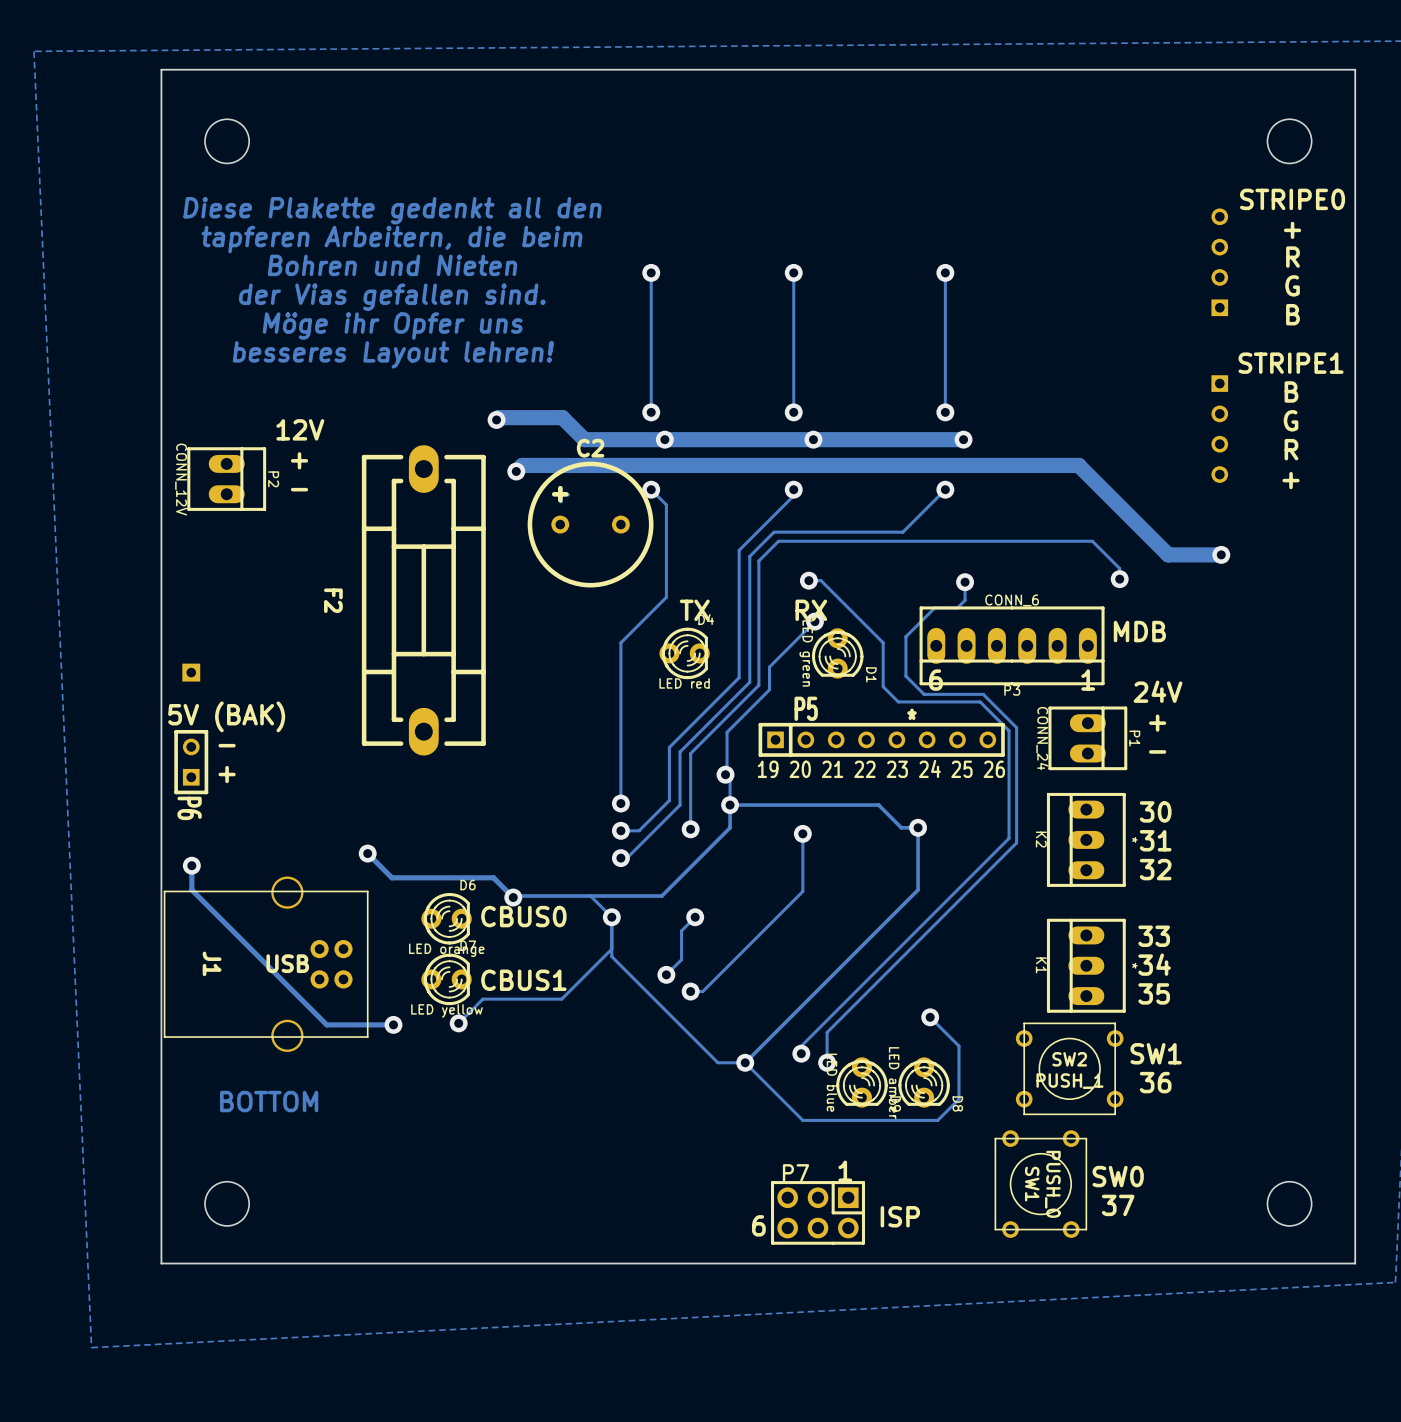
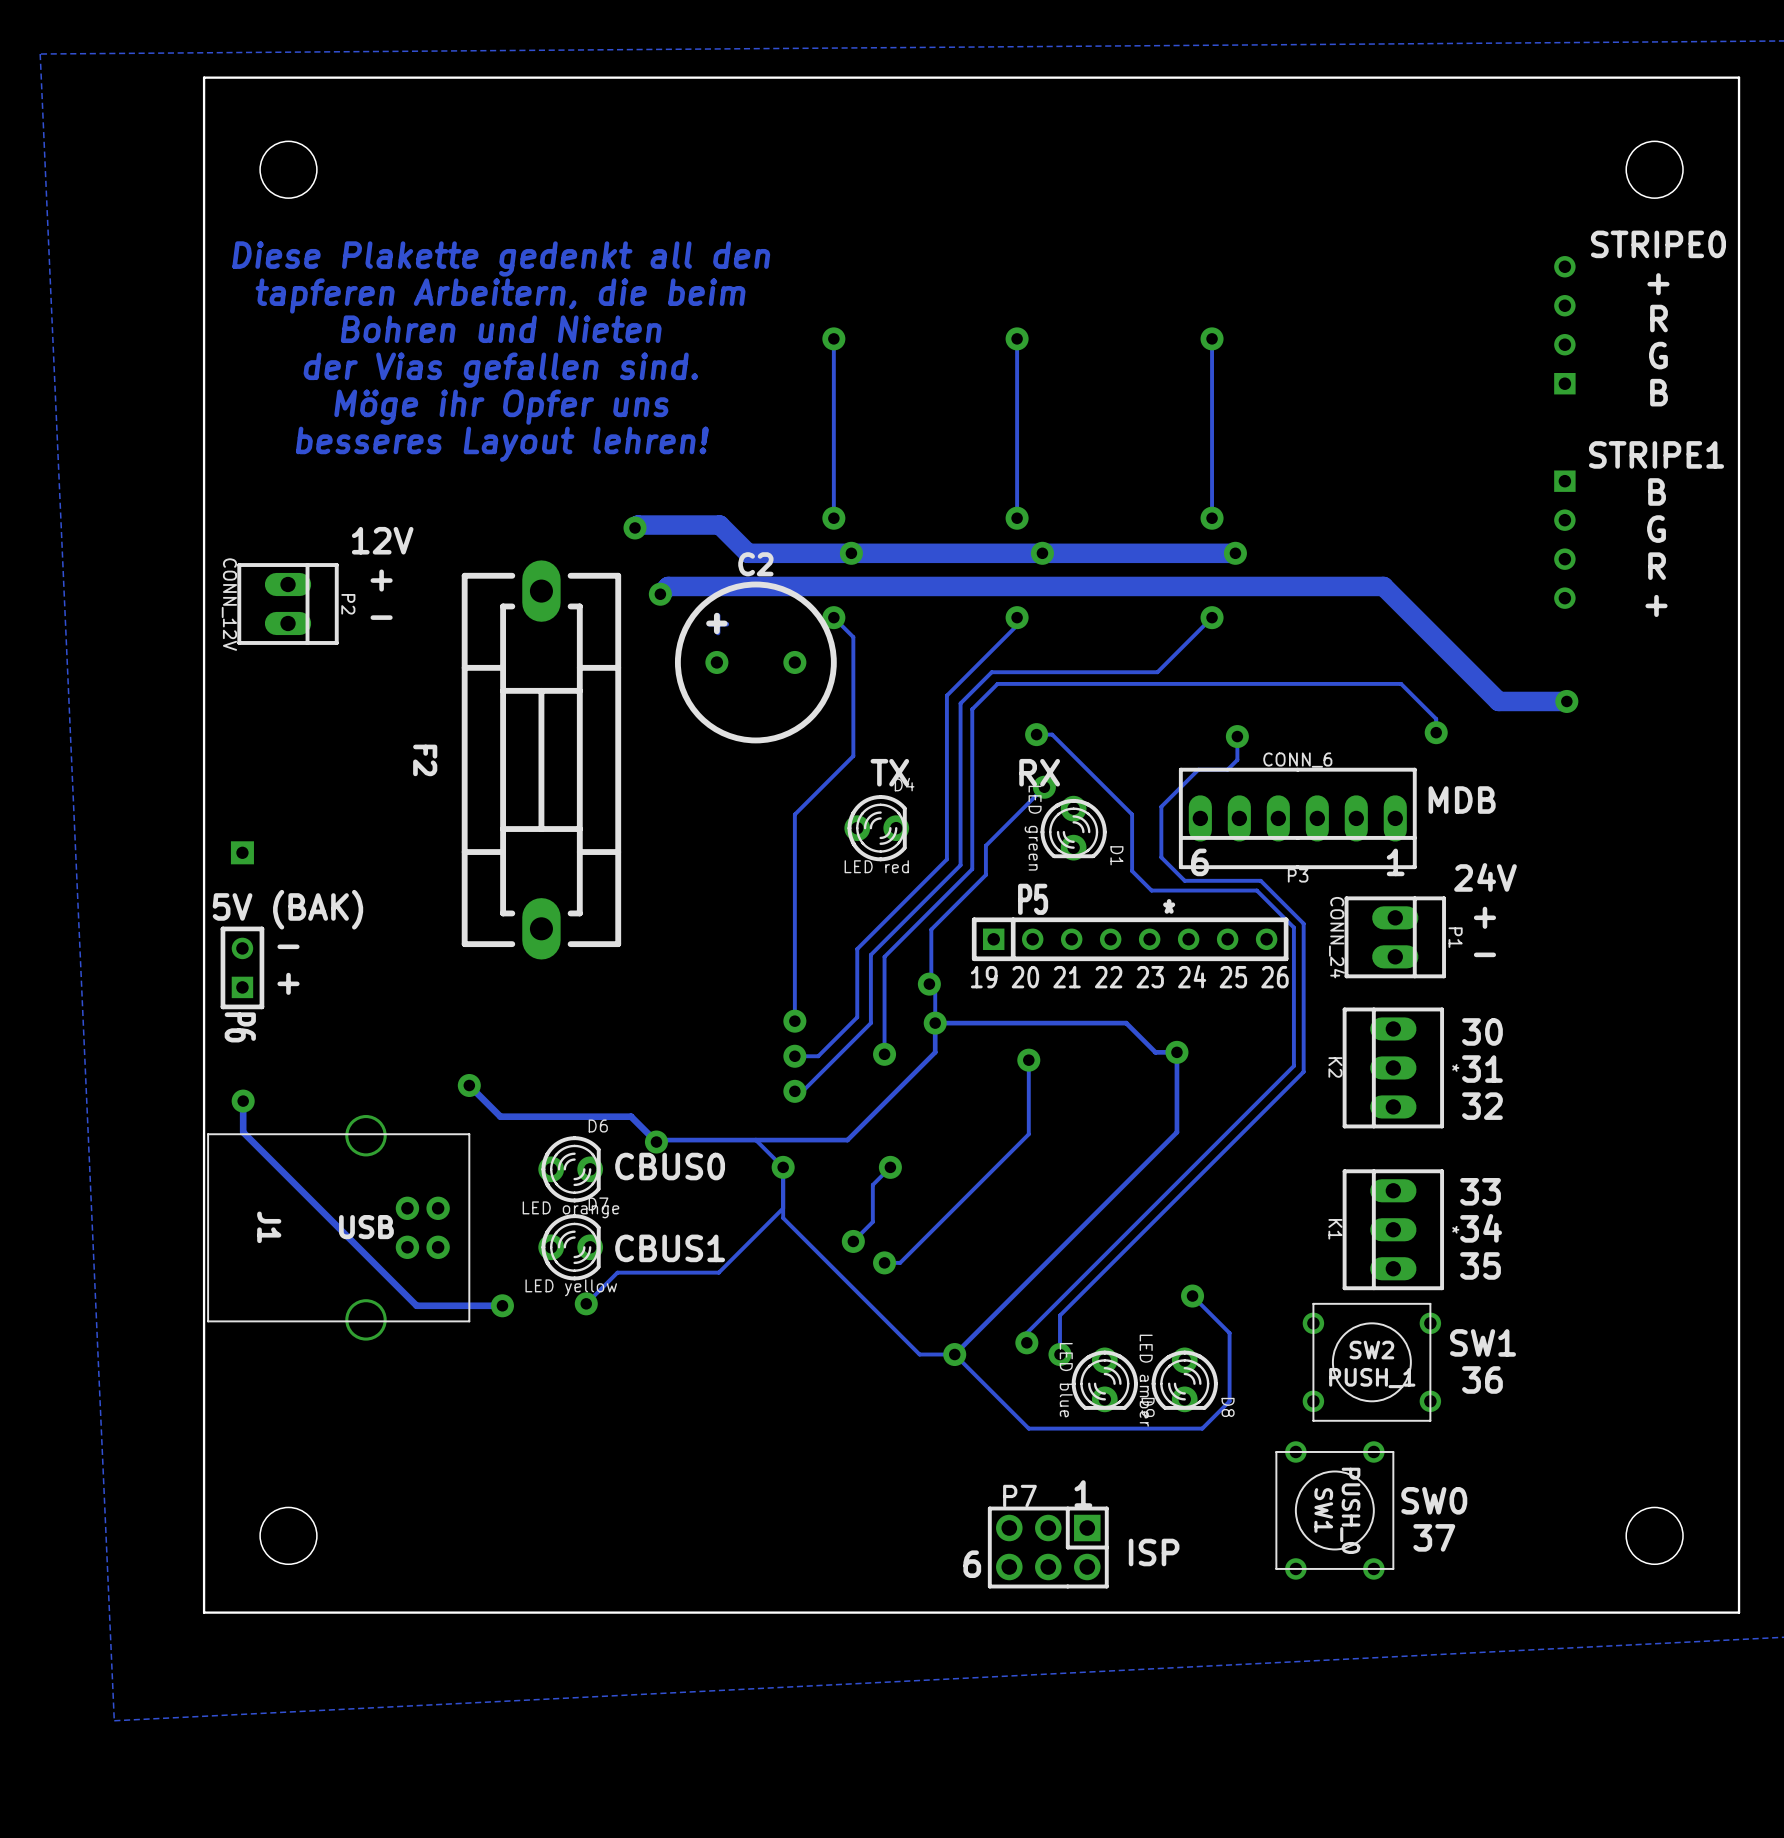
text: BOTTOM (269, 1101) -> none

